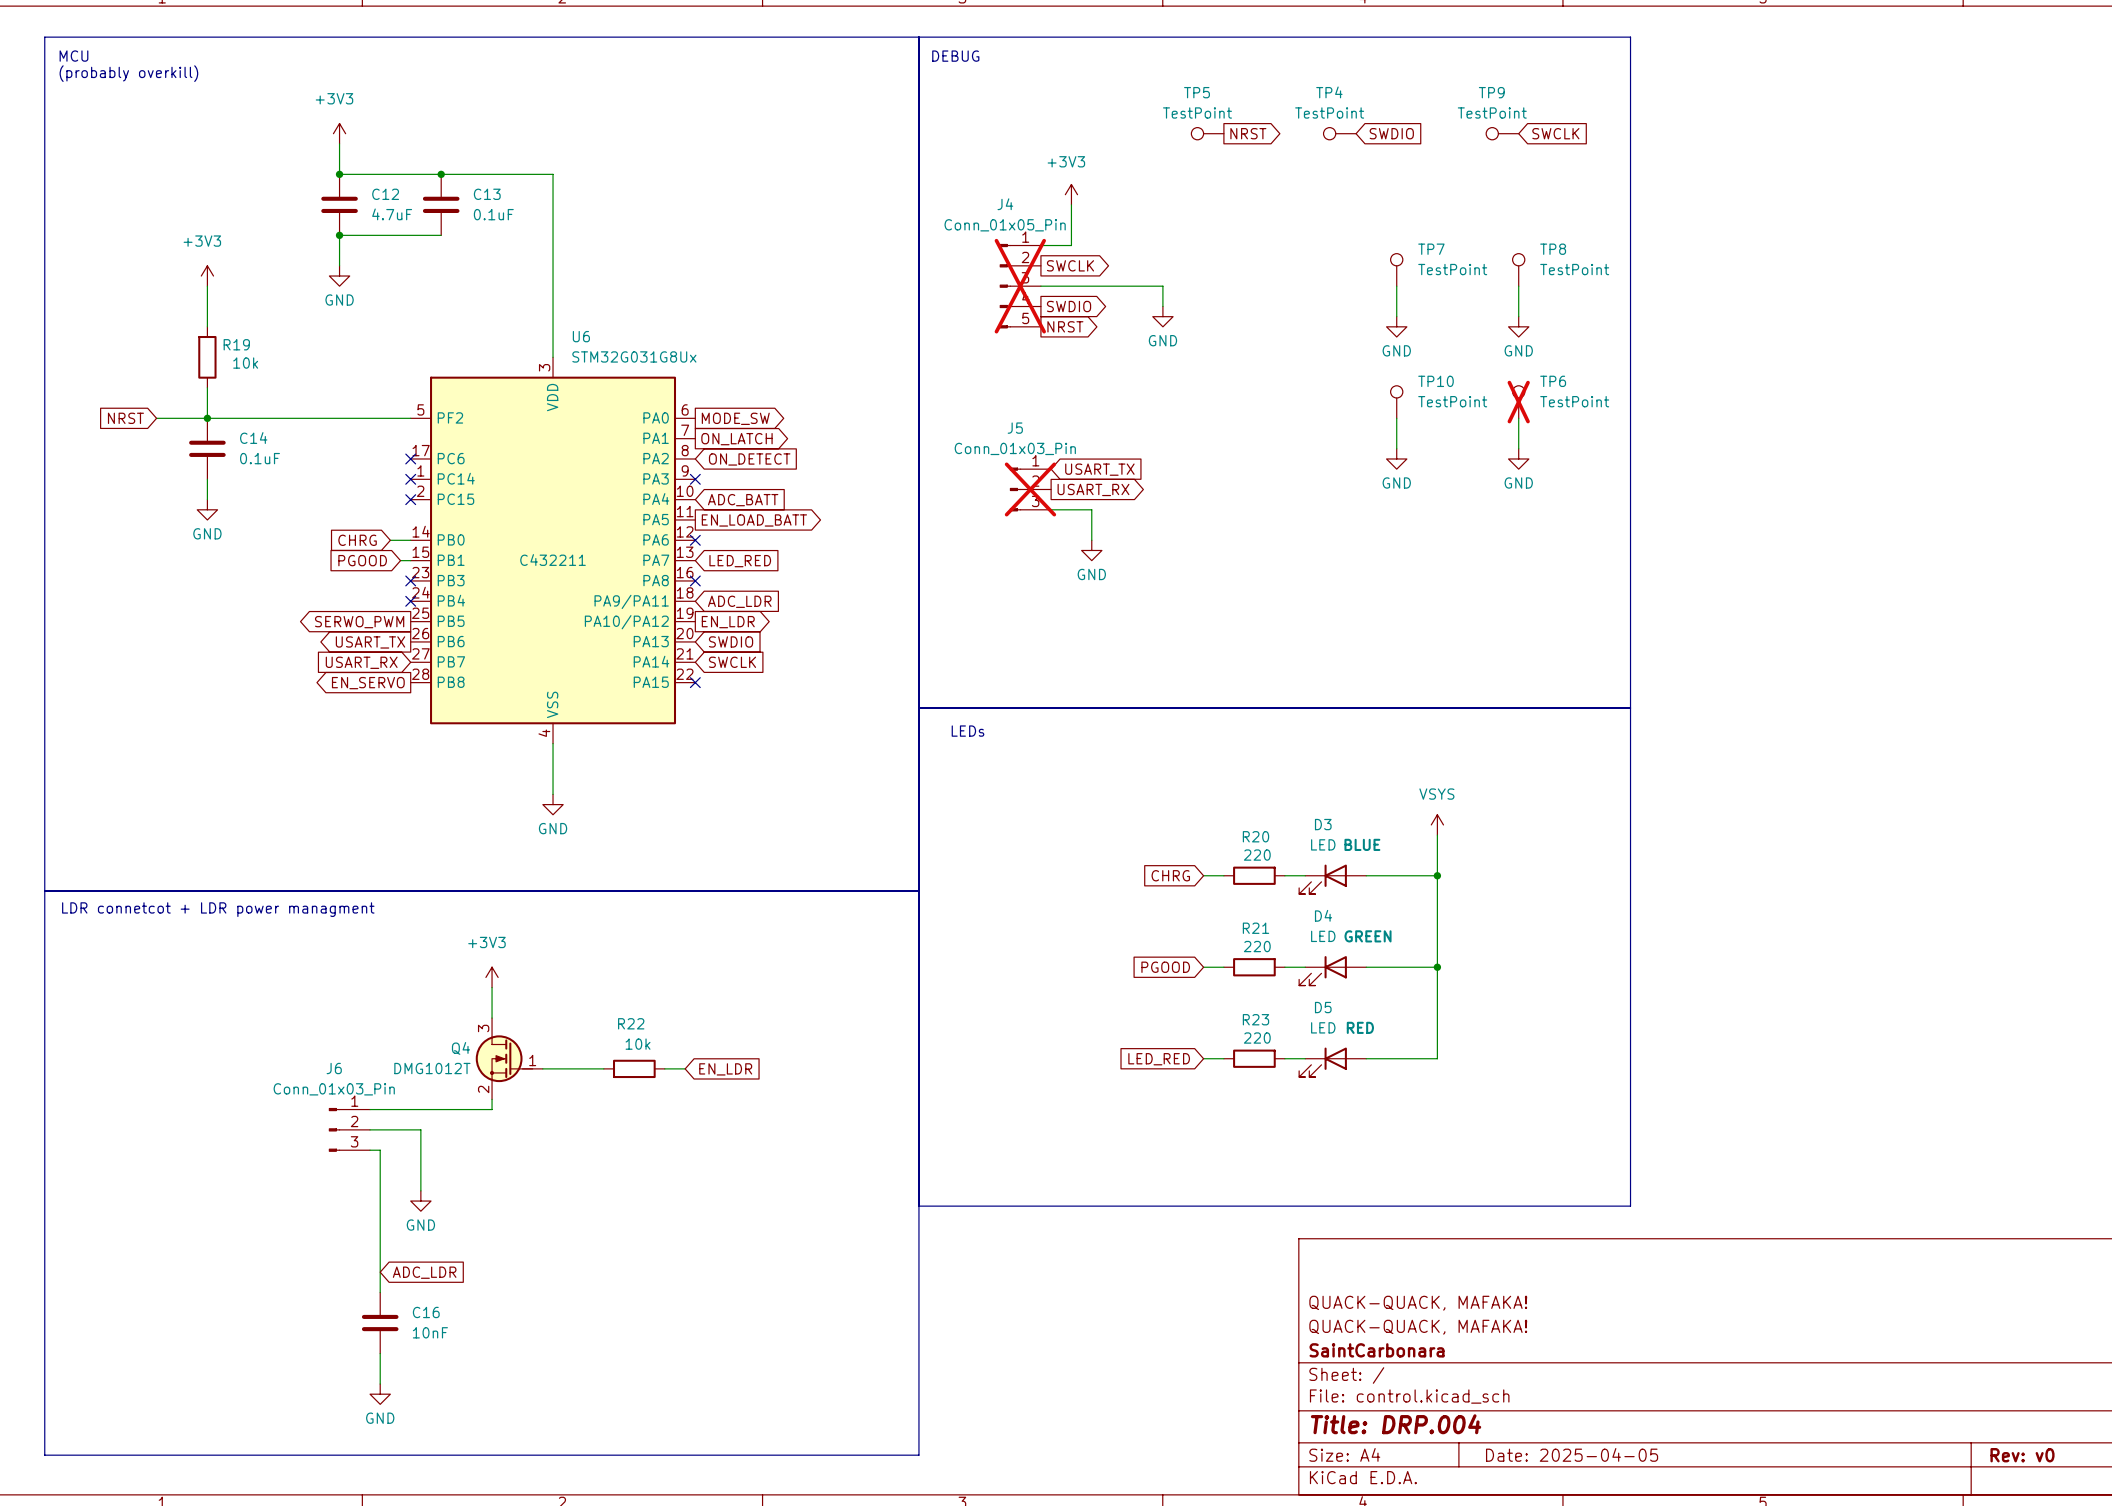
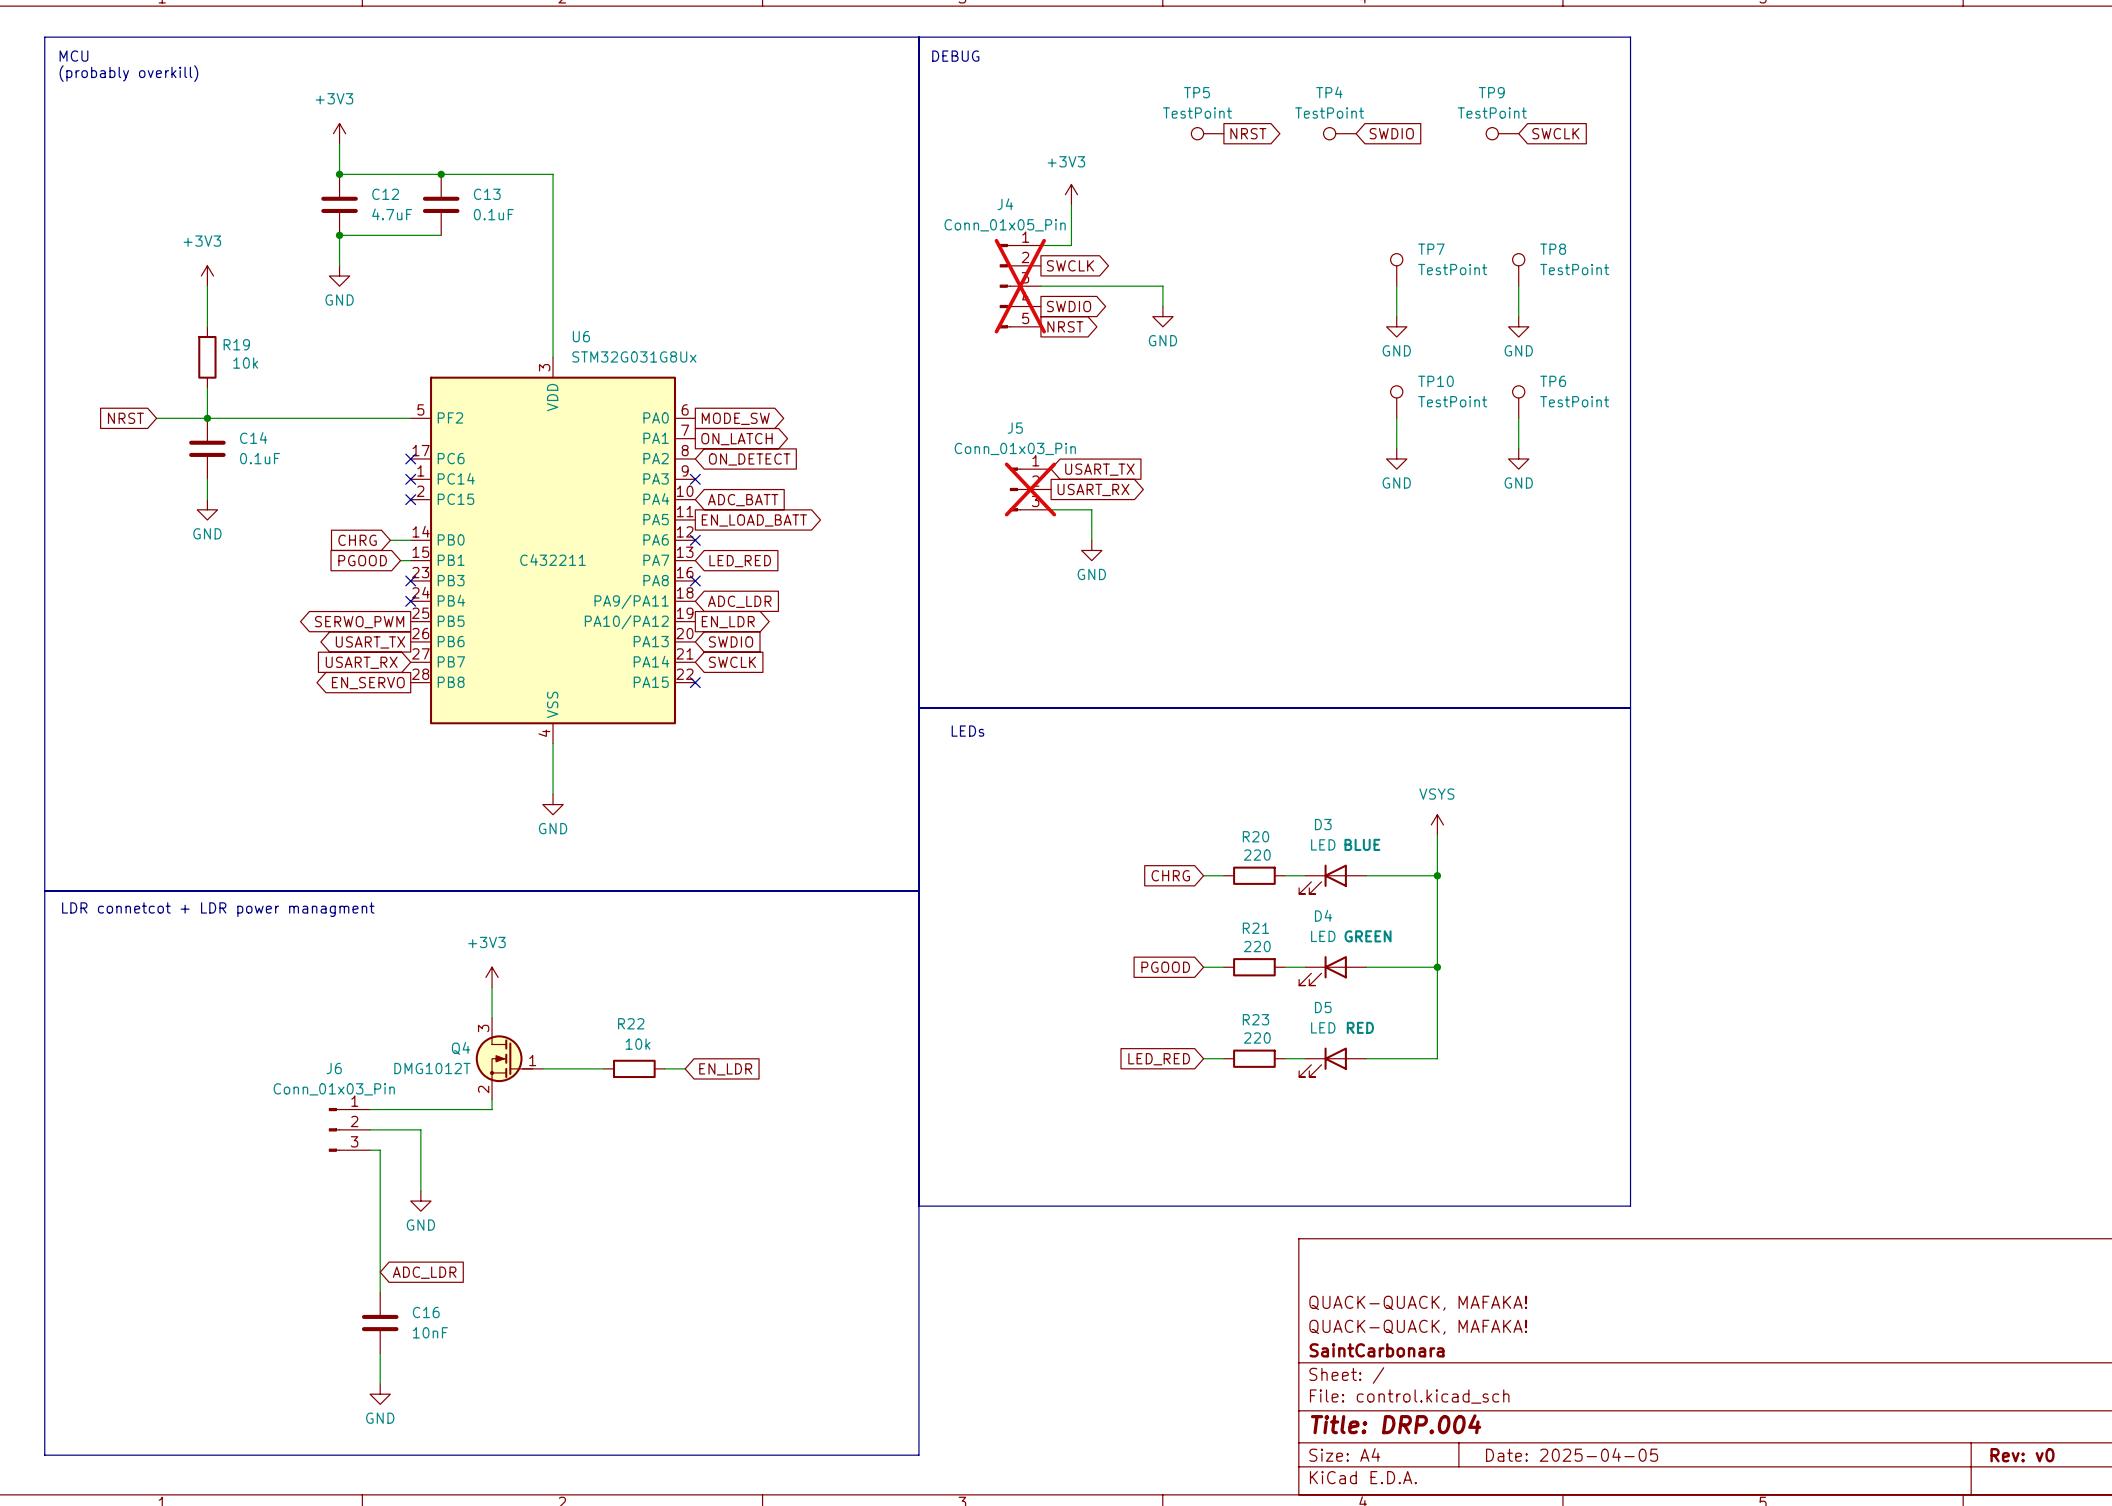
TP6 do-not-place cross: (1518, 402) -> none

